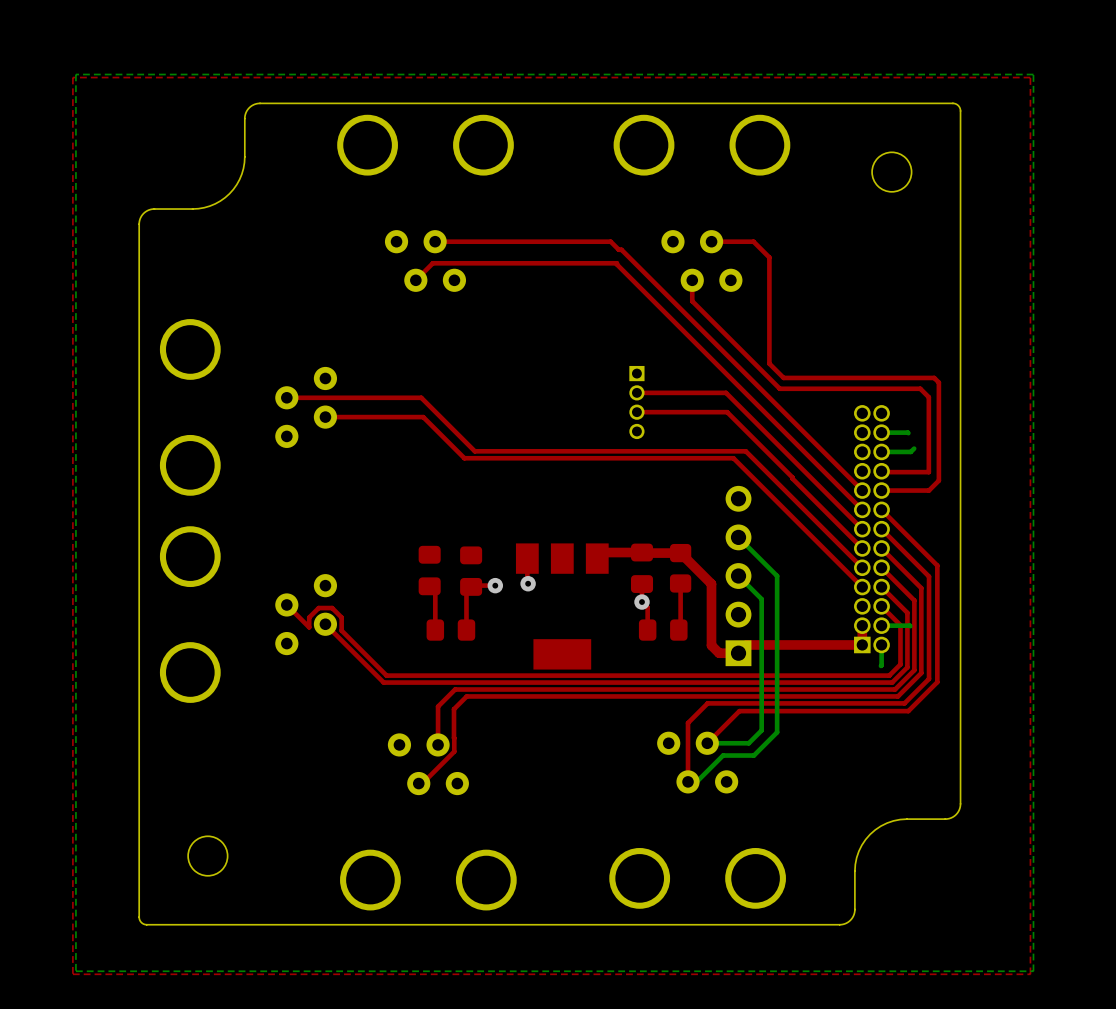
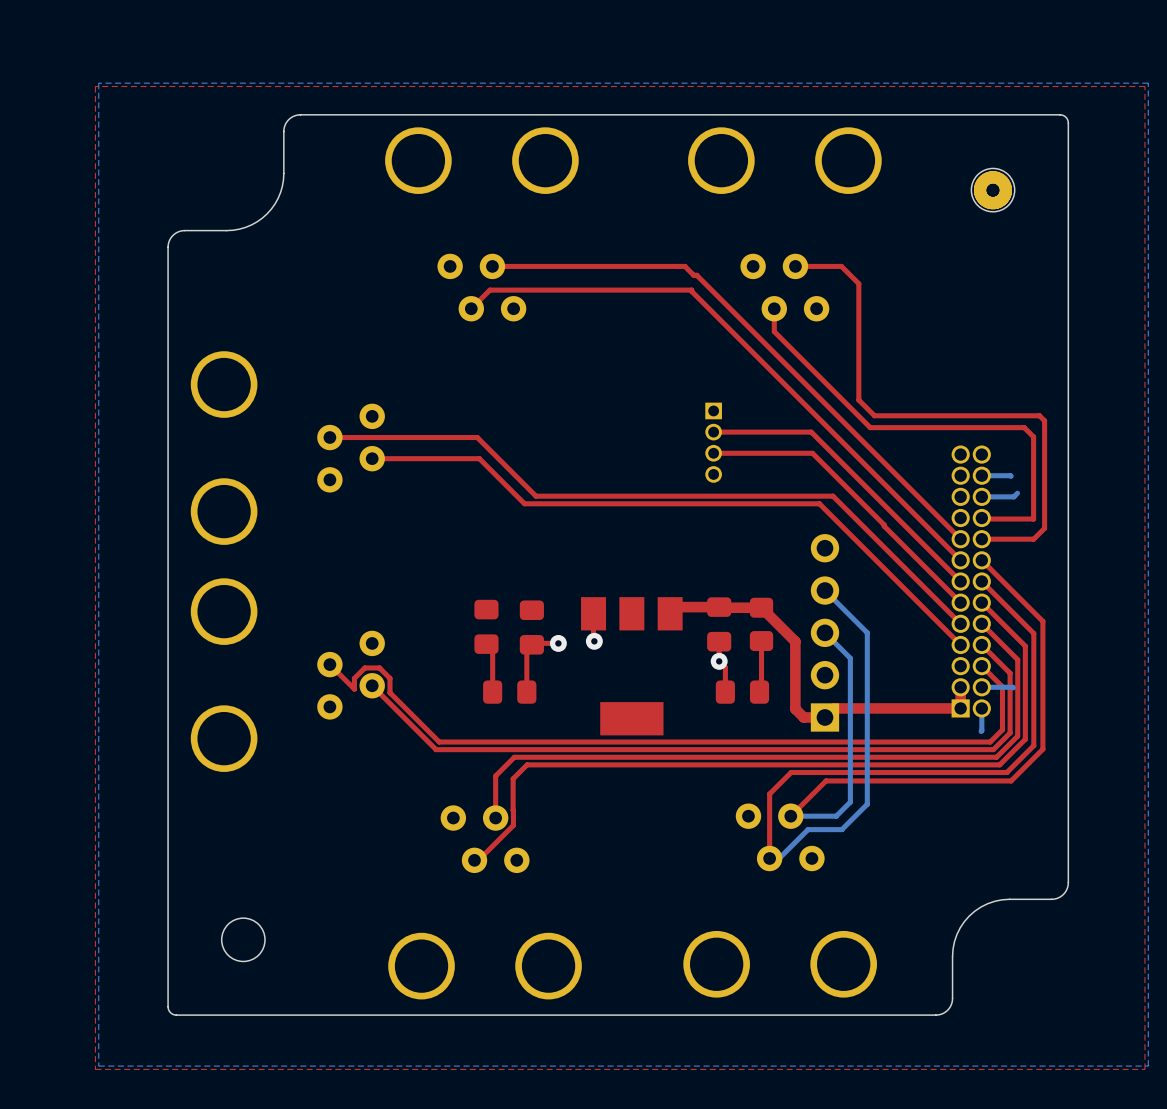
part: none -> (992, 190)

